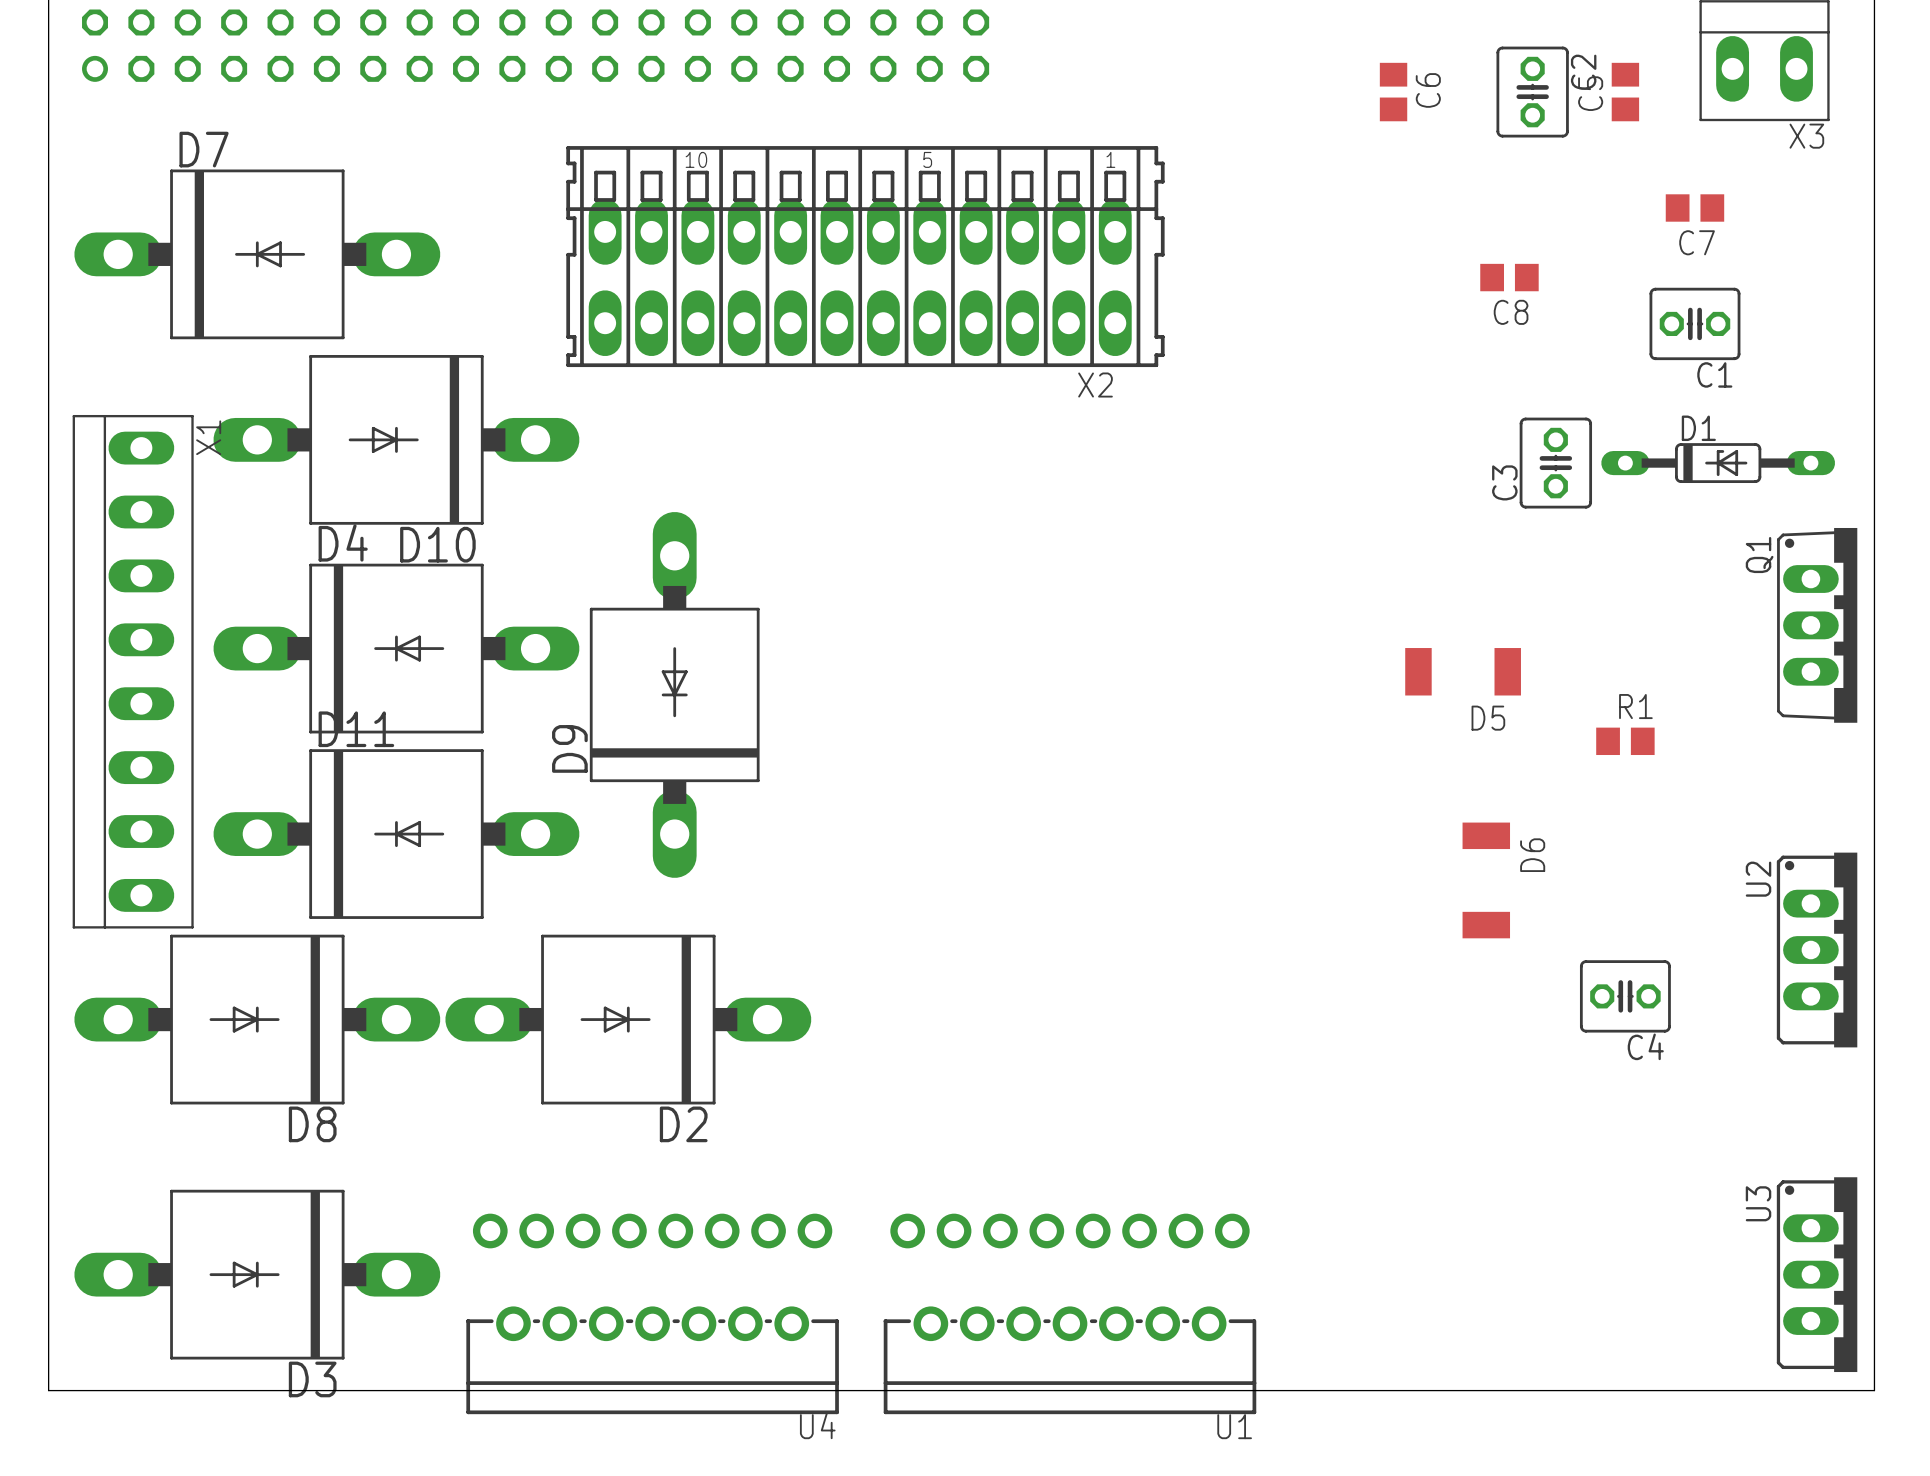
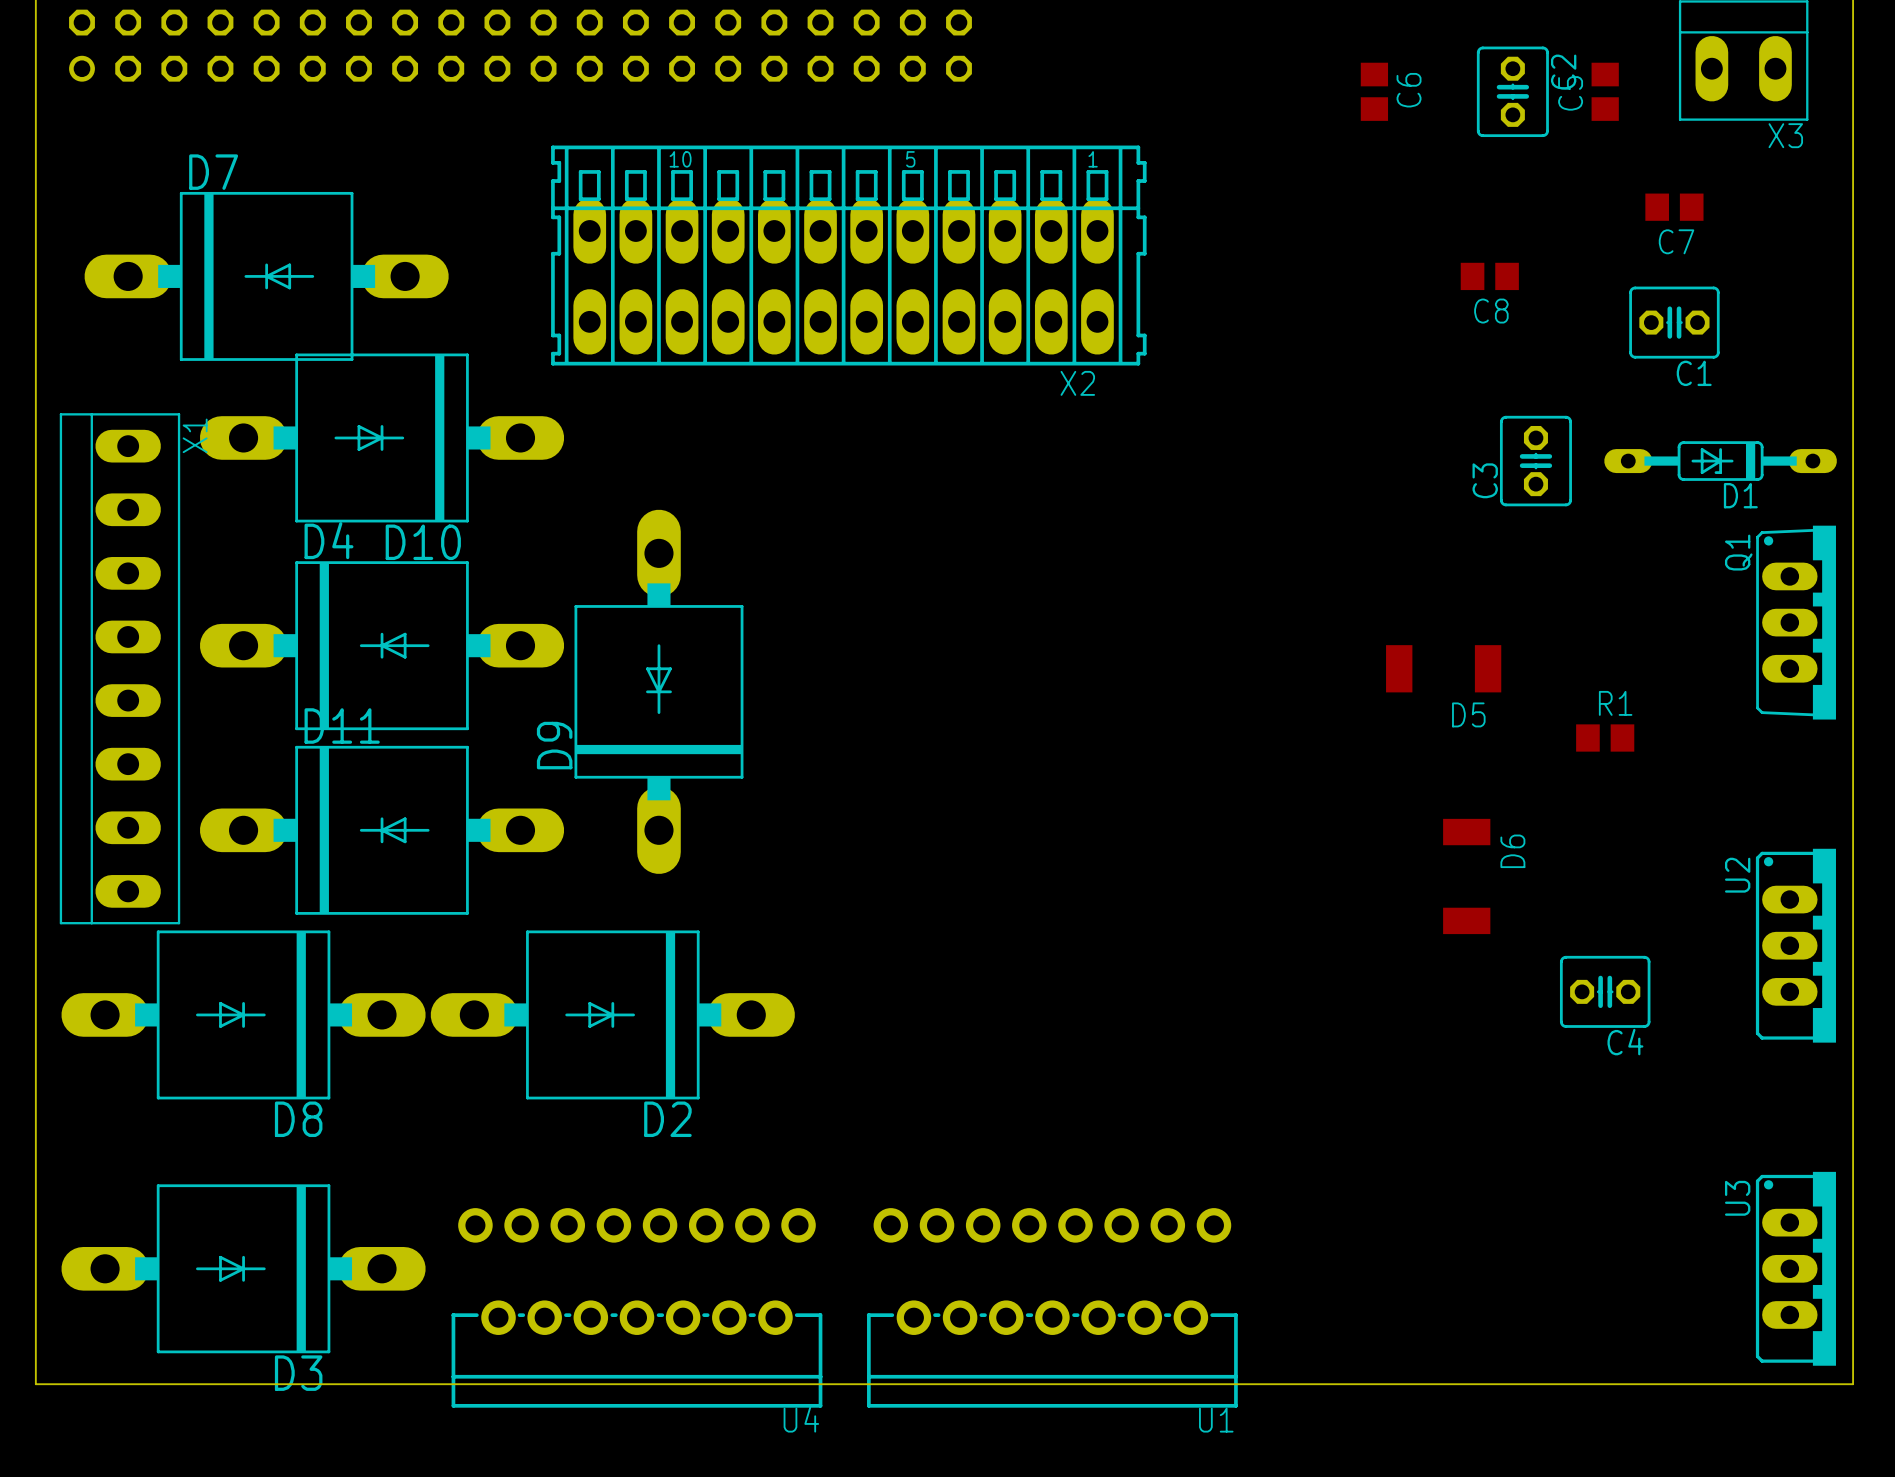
D7 position: (257, 254) -> (266, 276)
D1 rotation: 0° (1718, 463) -> 180° (1720, 461)

